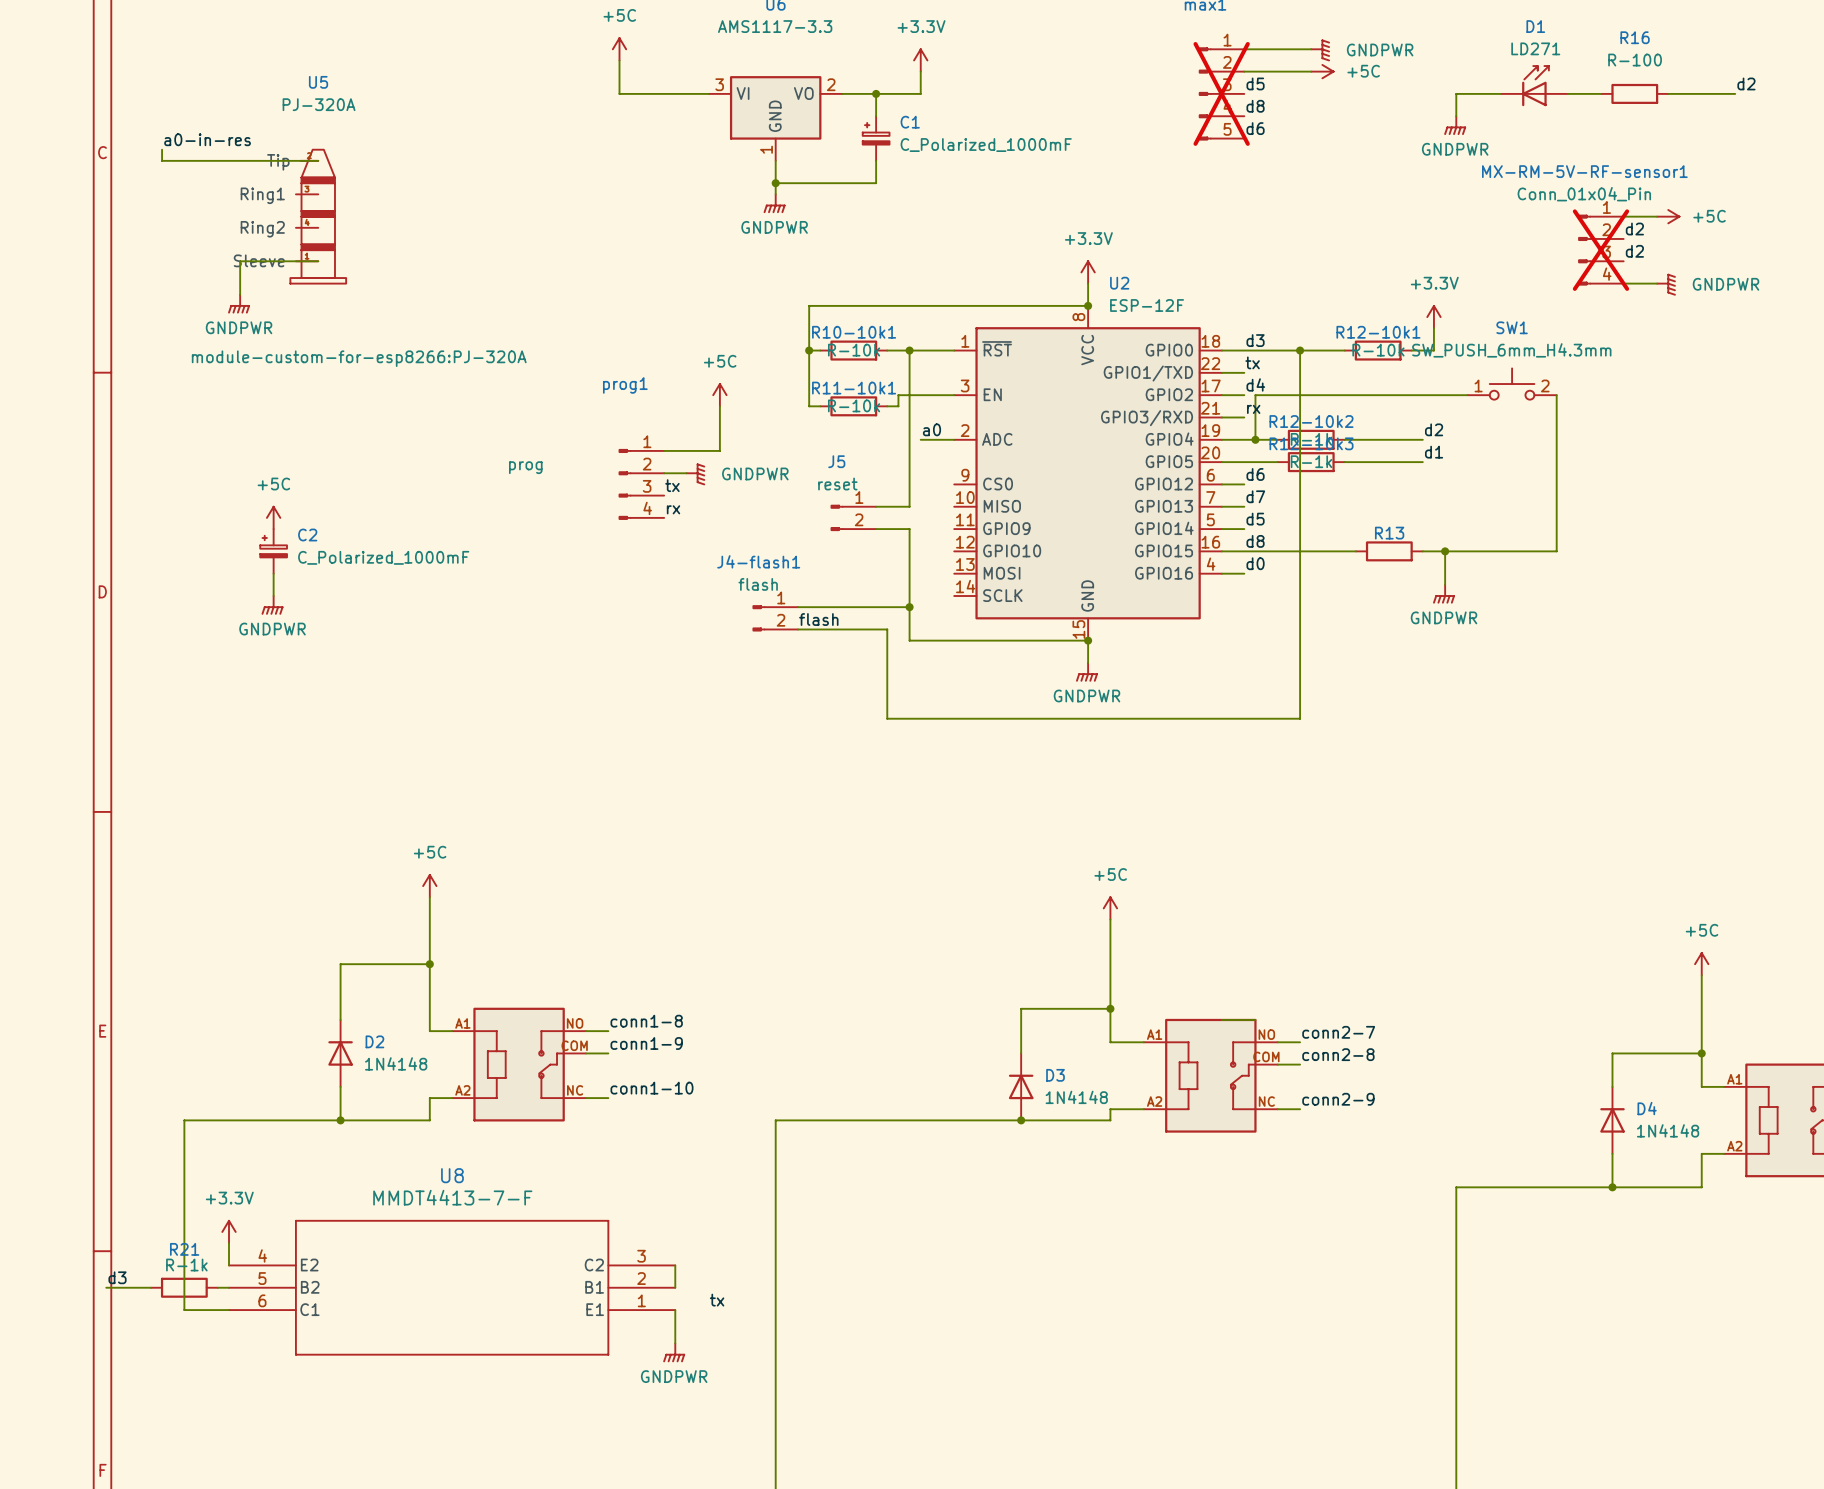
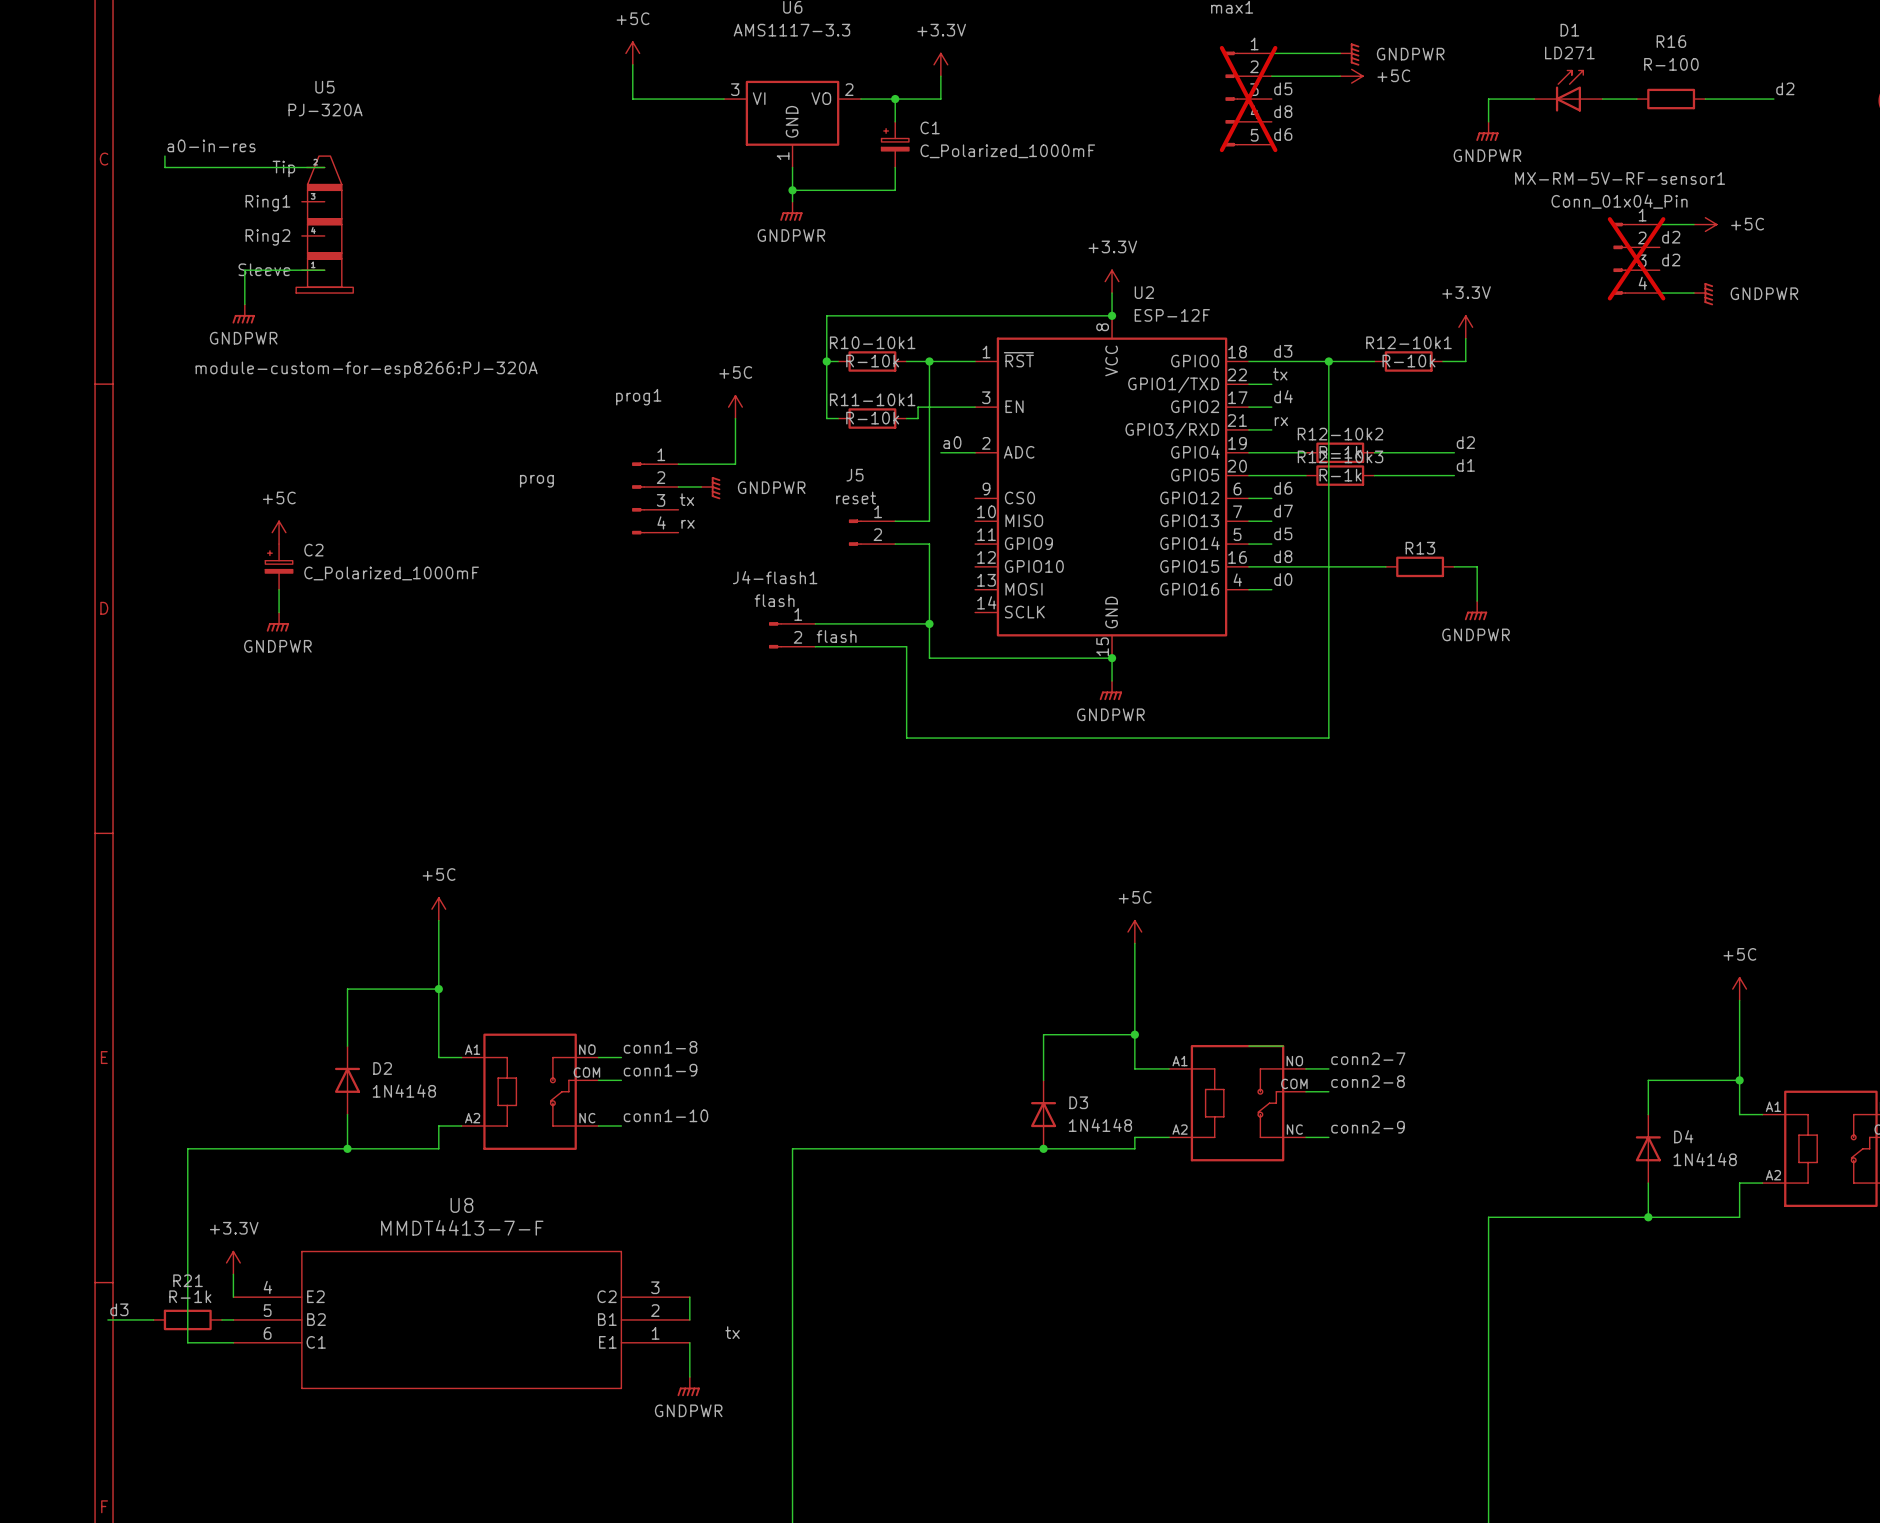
SW1: SW_PUSH_6mm_H4.3mm (1512, 384) -> none
wire: (1467, 395) (1255, 395) (1255, 439) -> none
wire: (1556, 395) (1556, 551) (1445, 551) -> none
junction: (1255, 439) -> none
junction: (1445, 551) -> none

